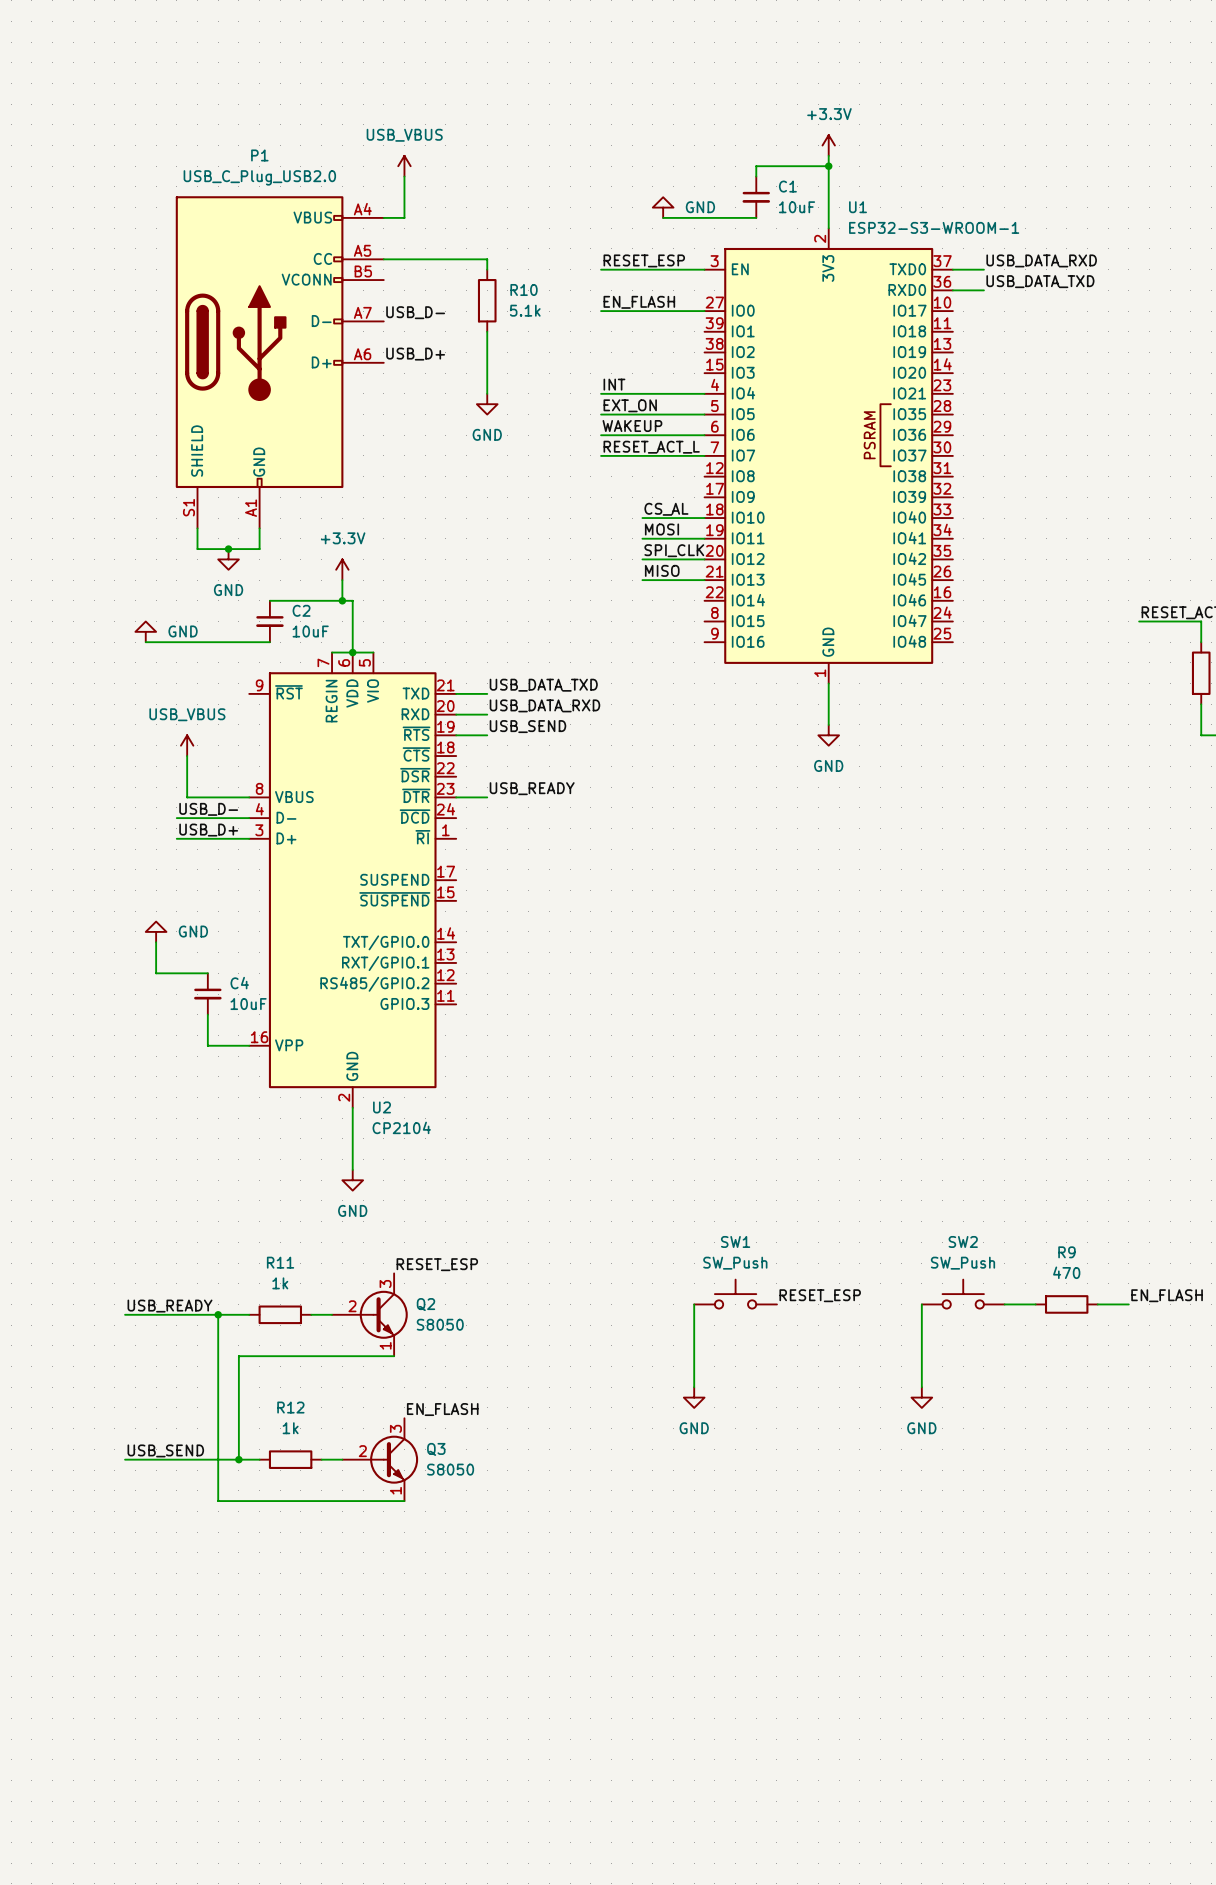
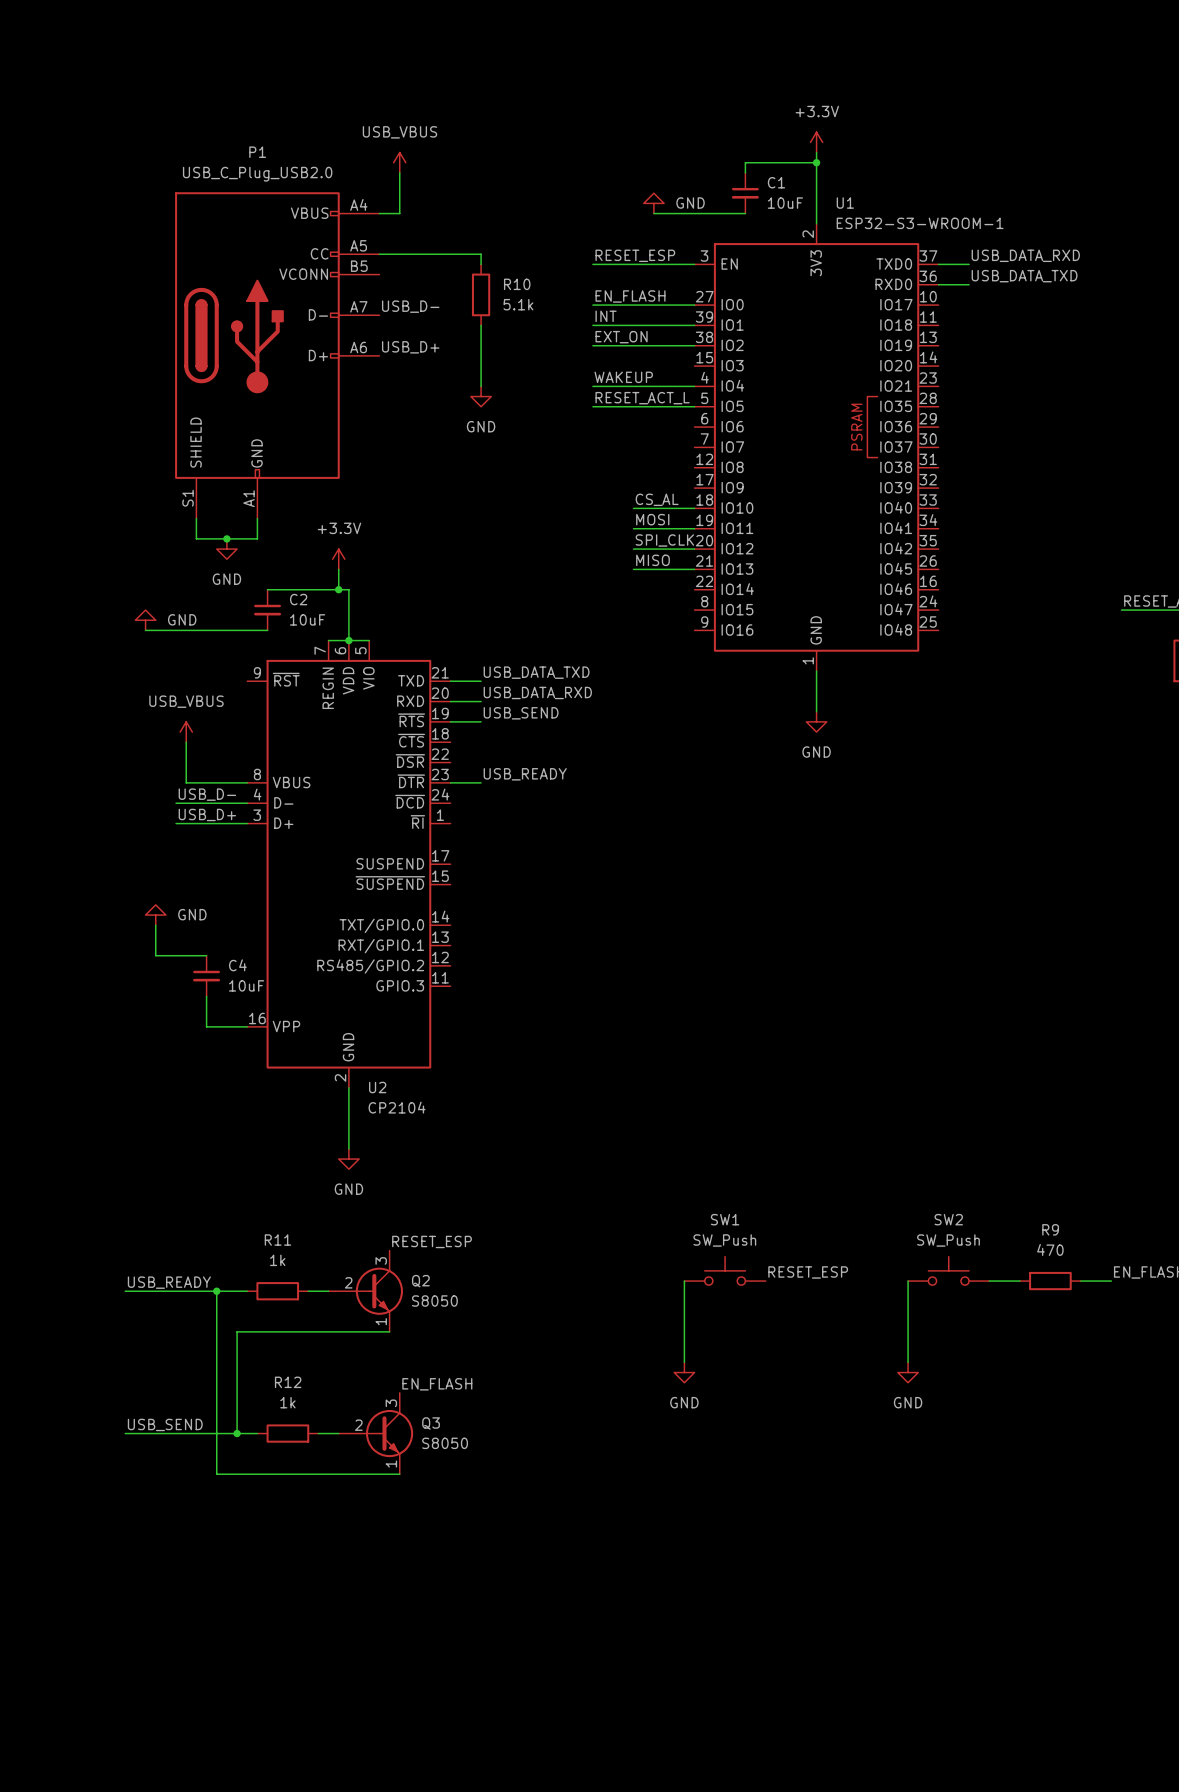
label: none -> INT (606, 316)
label: none -> EXT_ON (621, 337)
label: INT (614, 384) -> WAKEUP (623, 377)
label: EXT_ON (630, 405) -> RESET_ACT_L (642, 398)
label: WAKEUP (632, 426) -> none
wire: (601, 435) (704, 435) -> (592, 345) (694, 345)
label: RESET_ACT_L (651, 447) -> none
wire: (601, 455) (704, 455) -> (592, 325) (694, 325)

